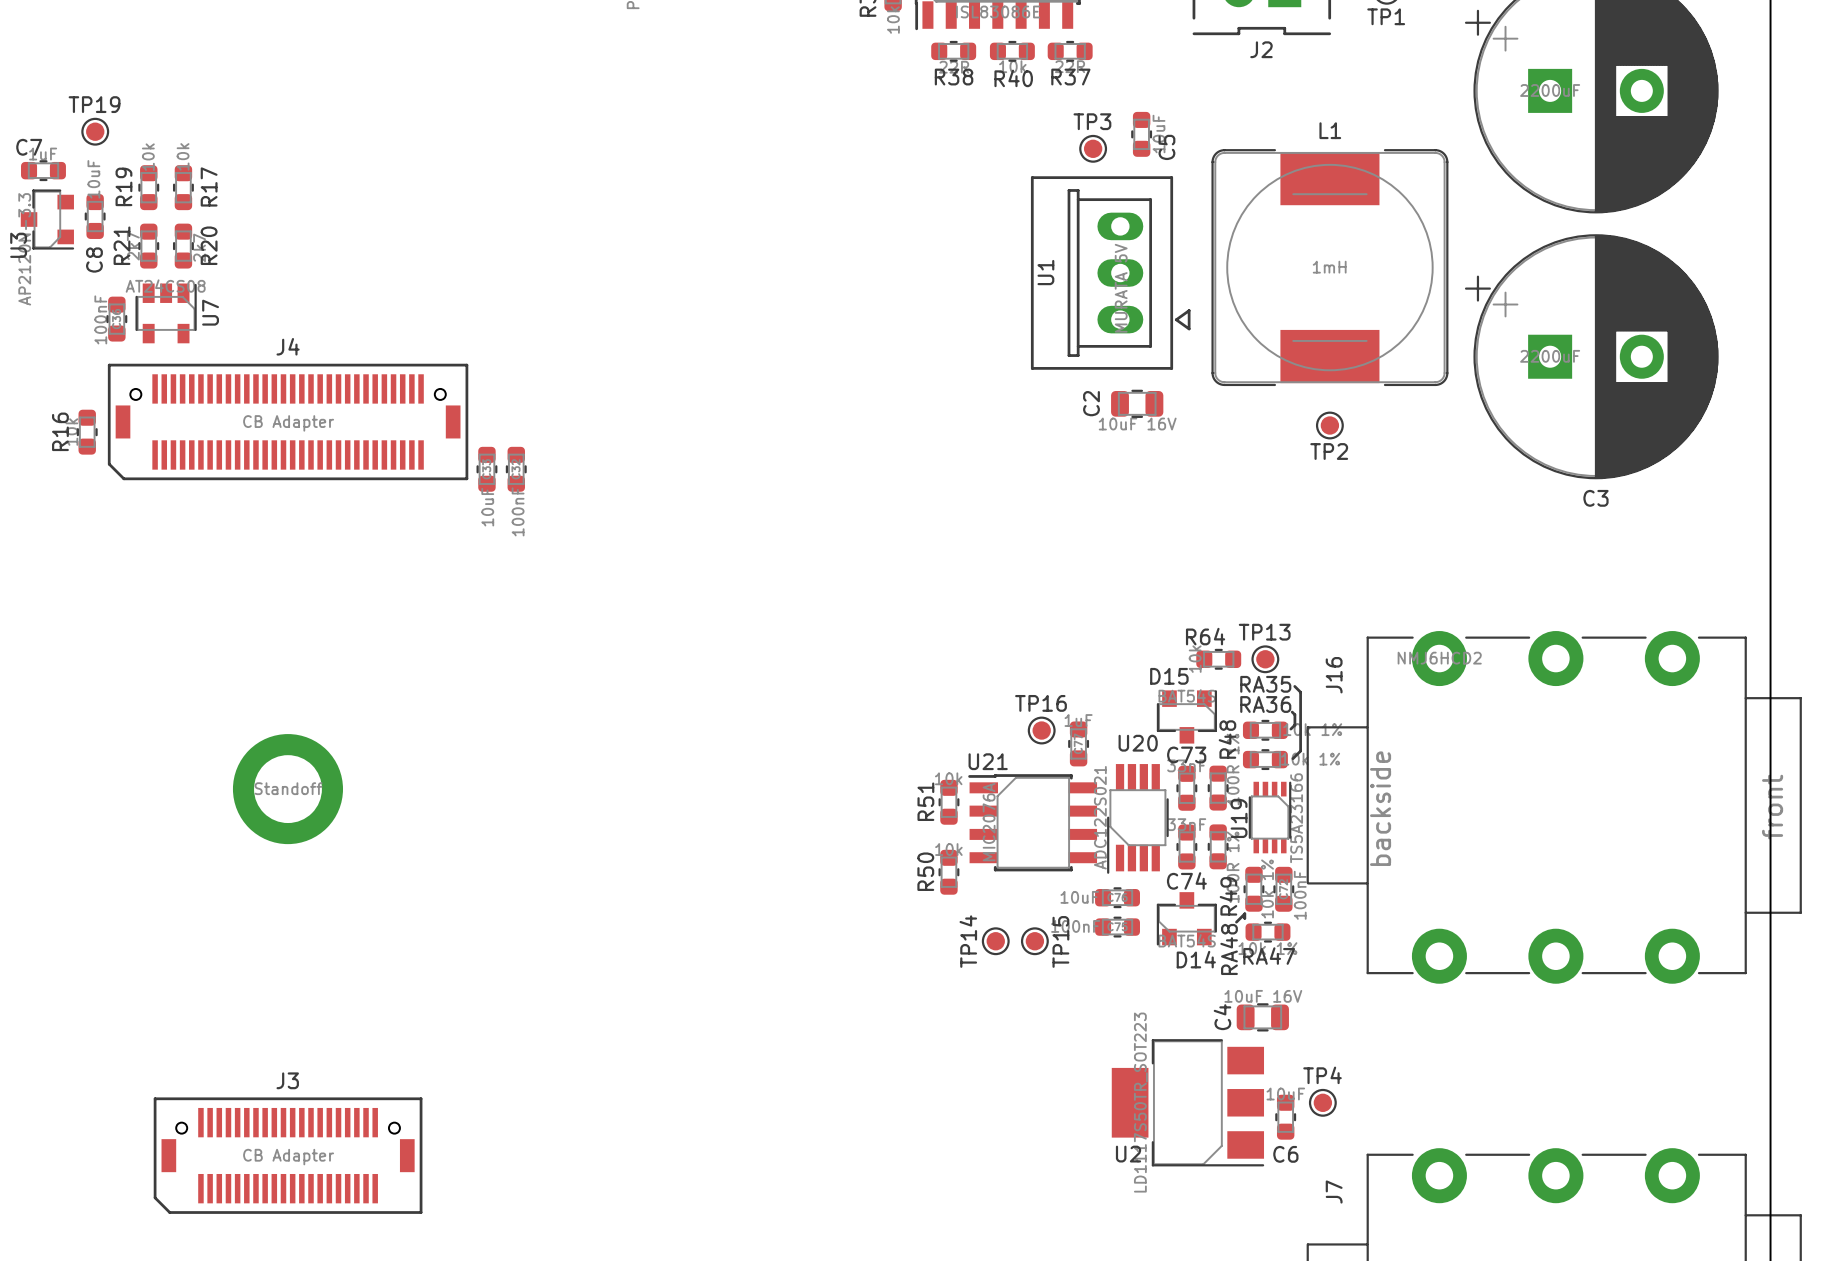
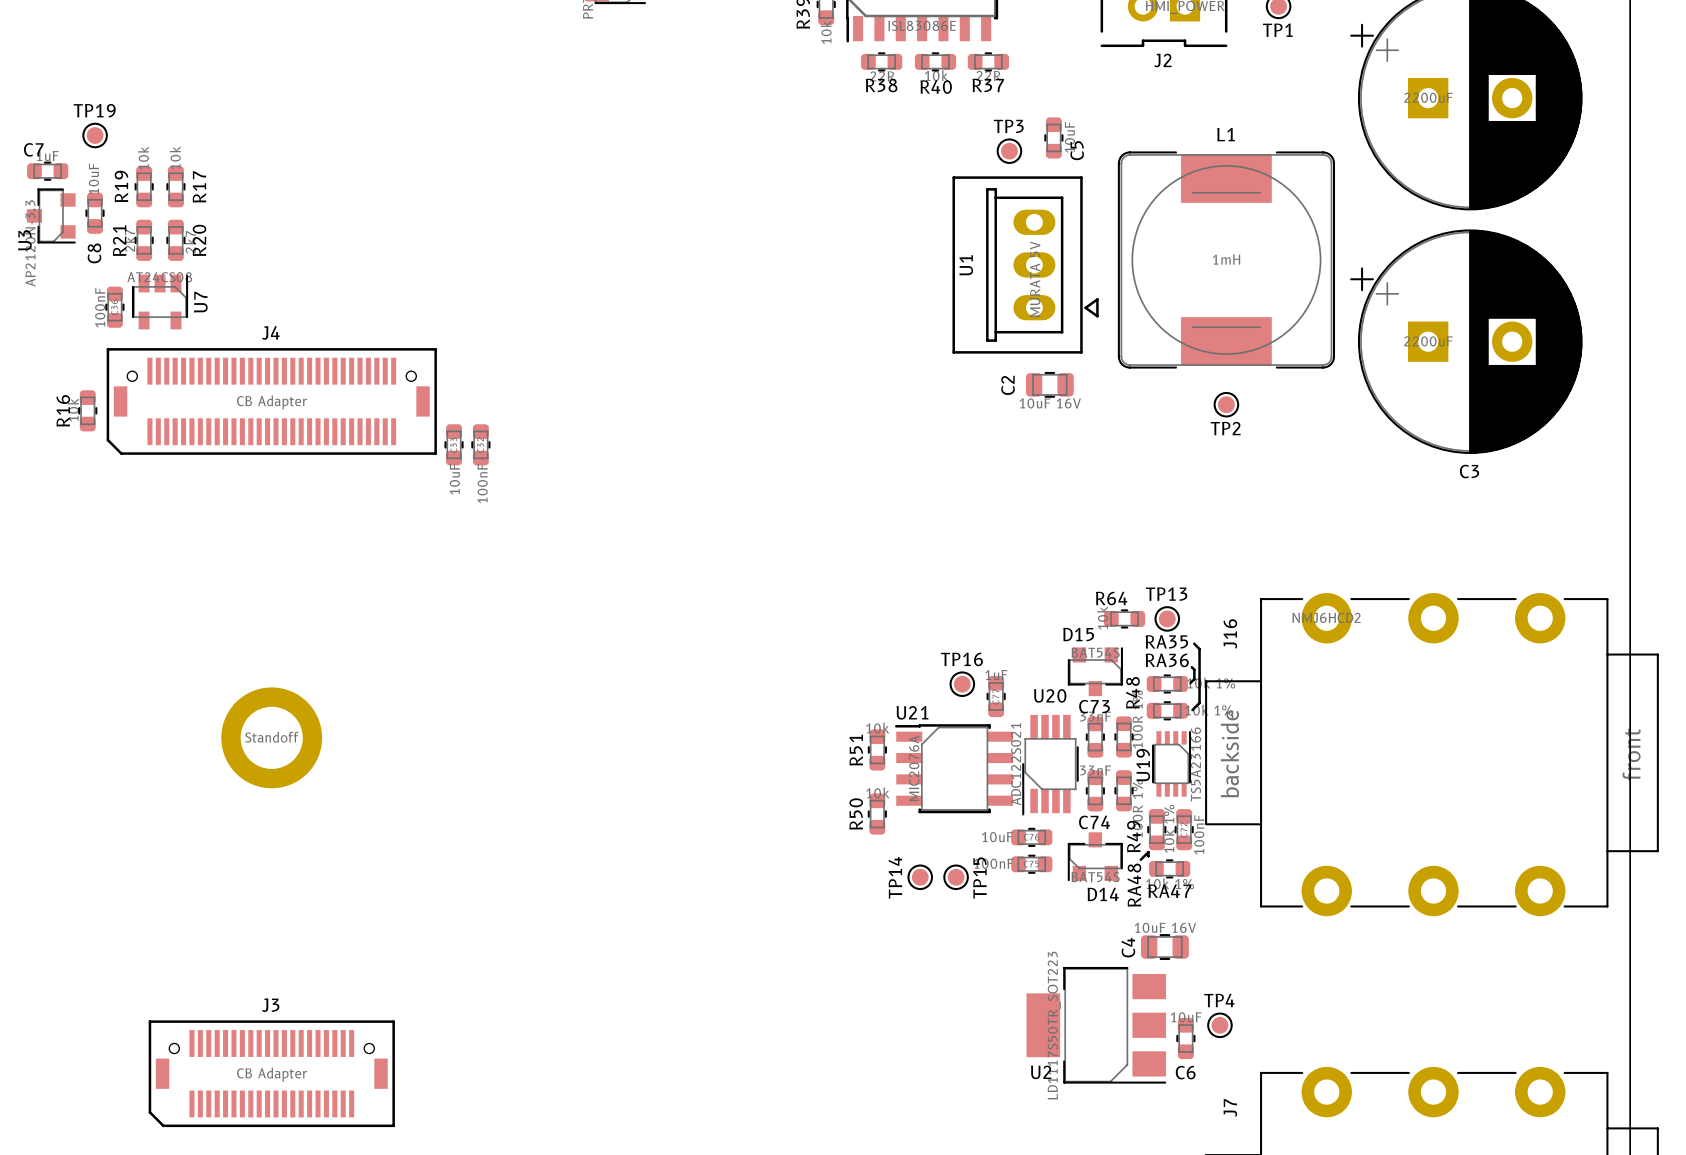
J16 text position: backside (1380, 808) -> backside (1229, 753)

